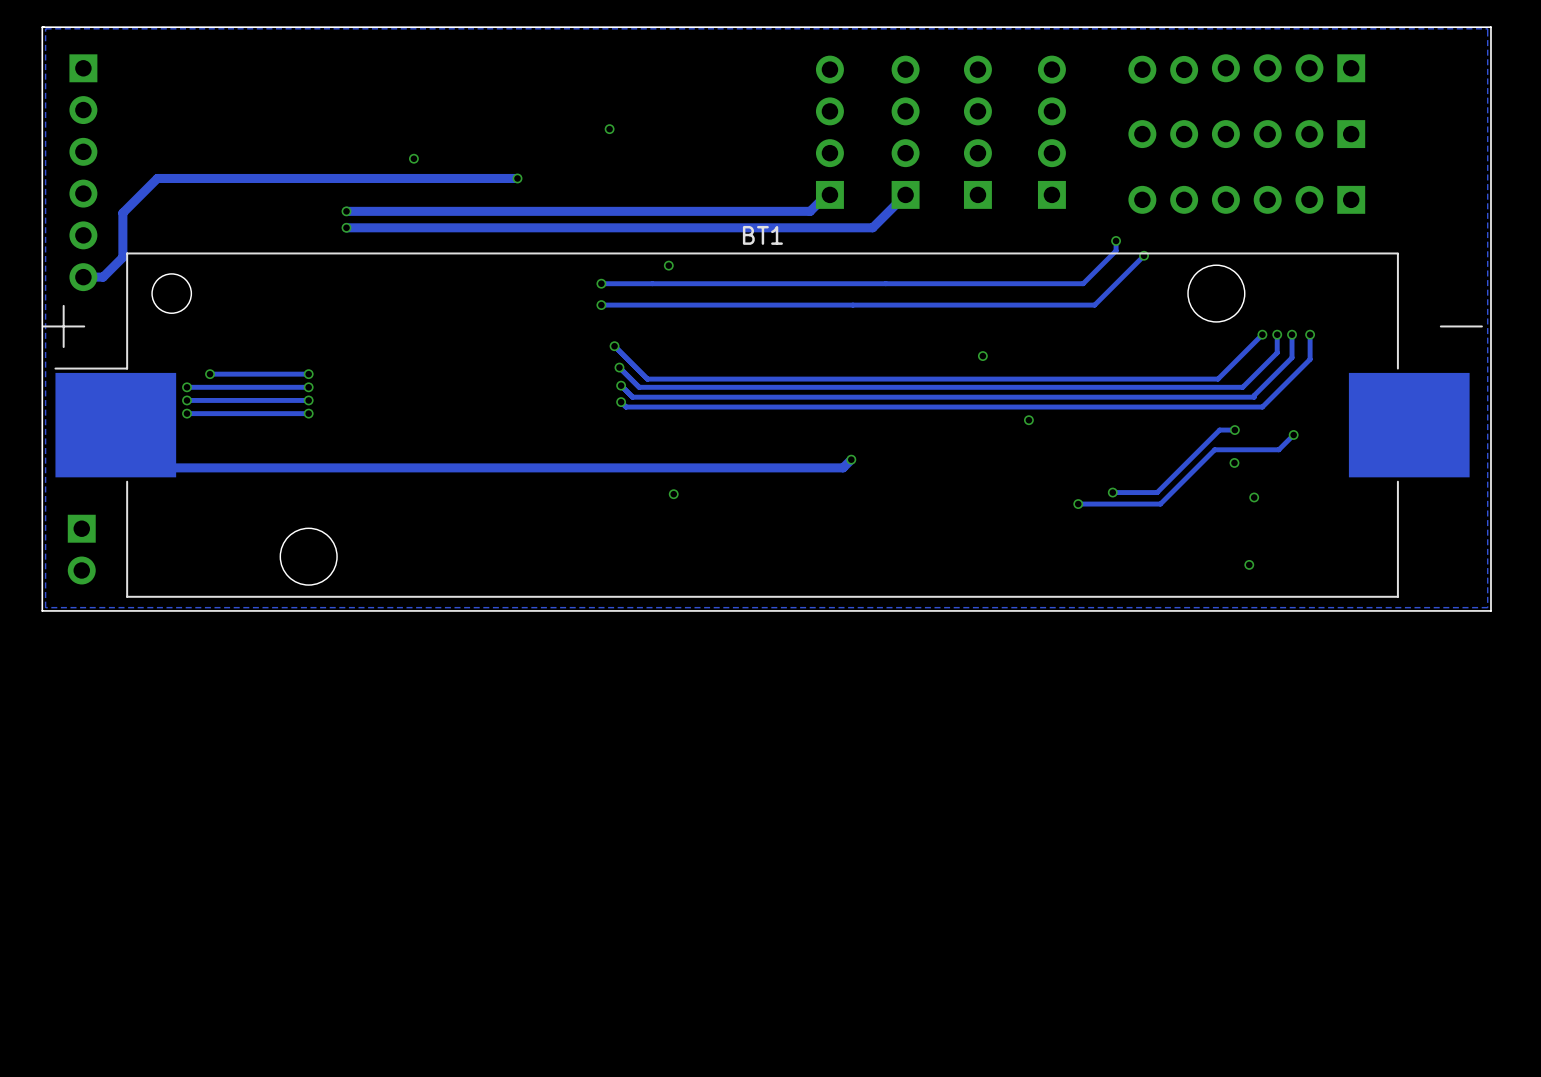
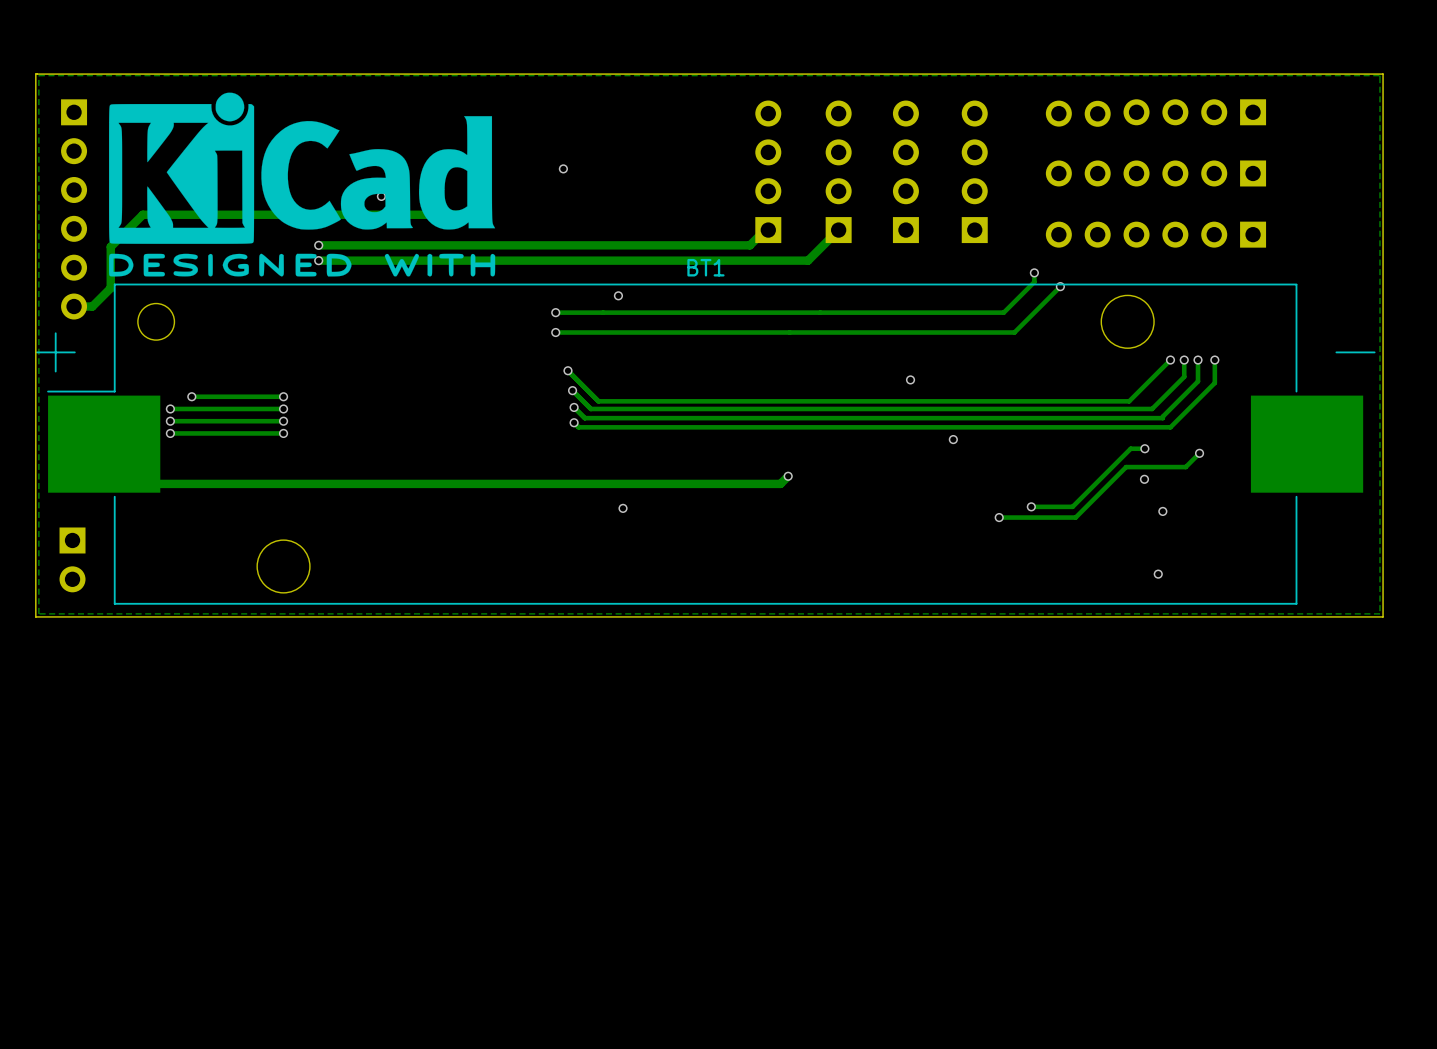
drawing: none -> [108, 92, 496, 277]

